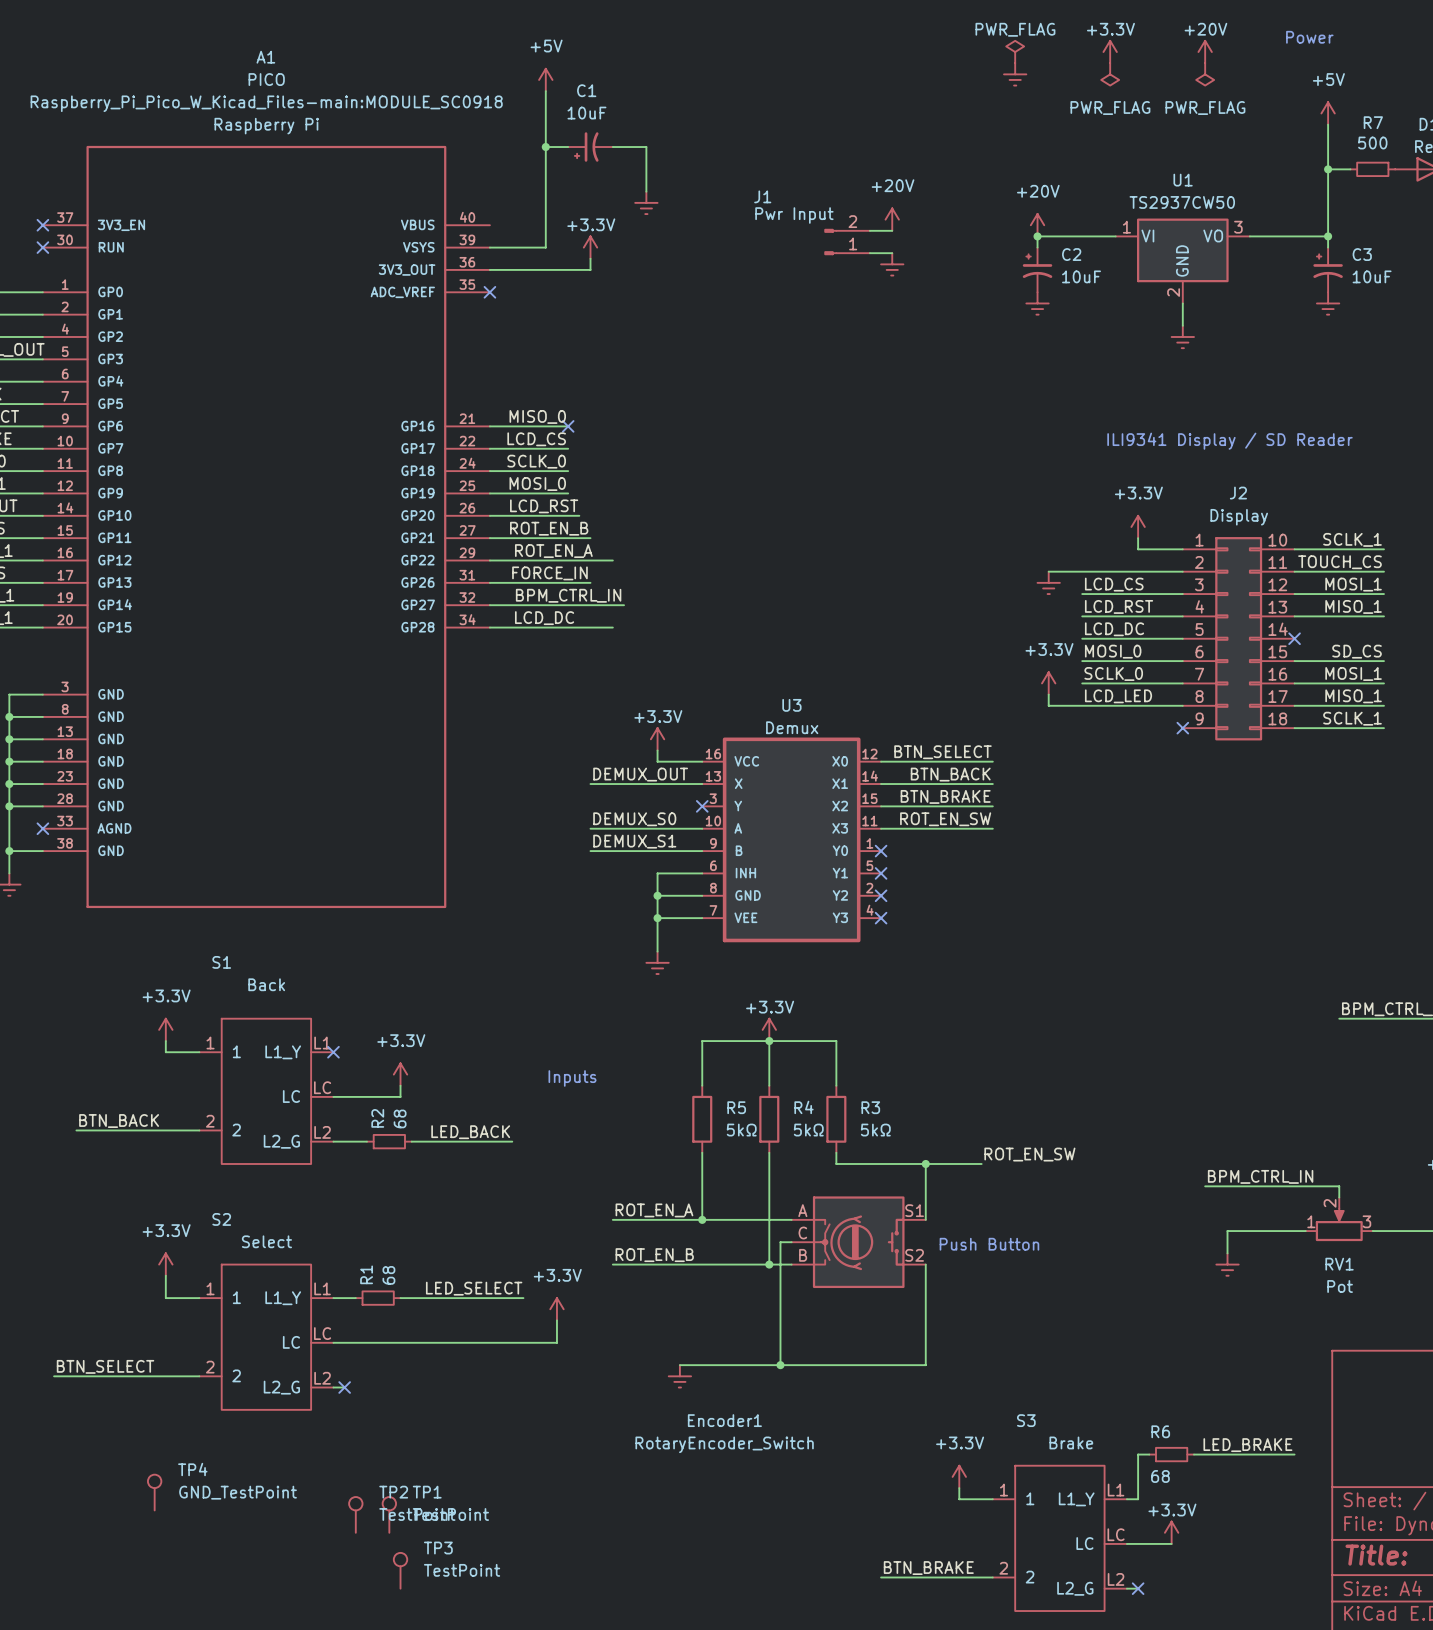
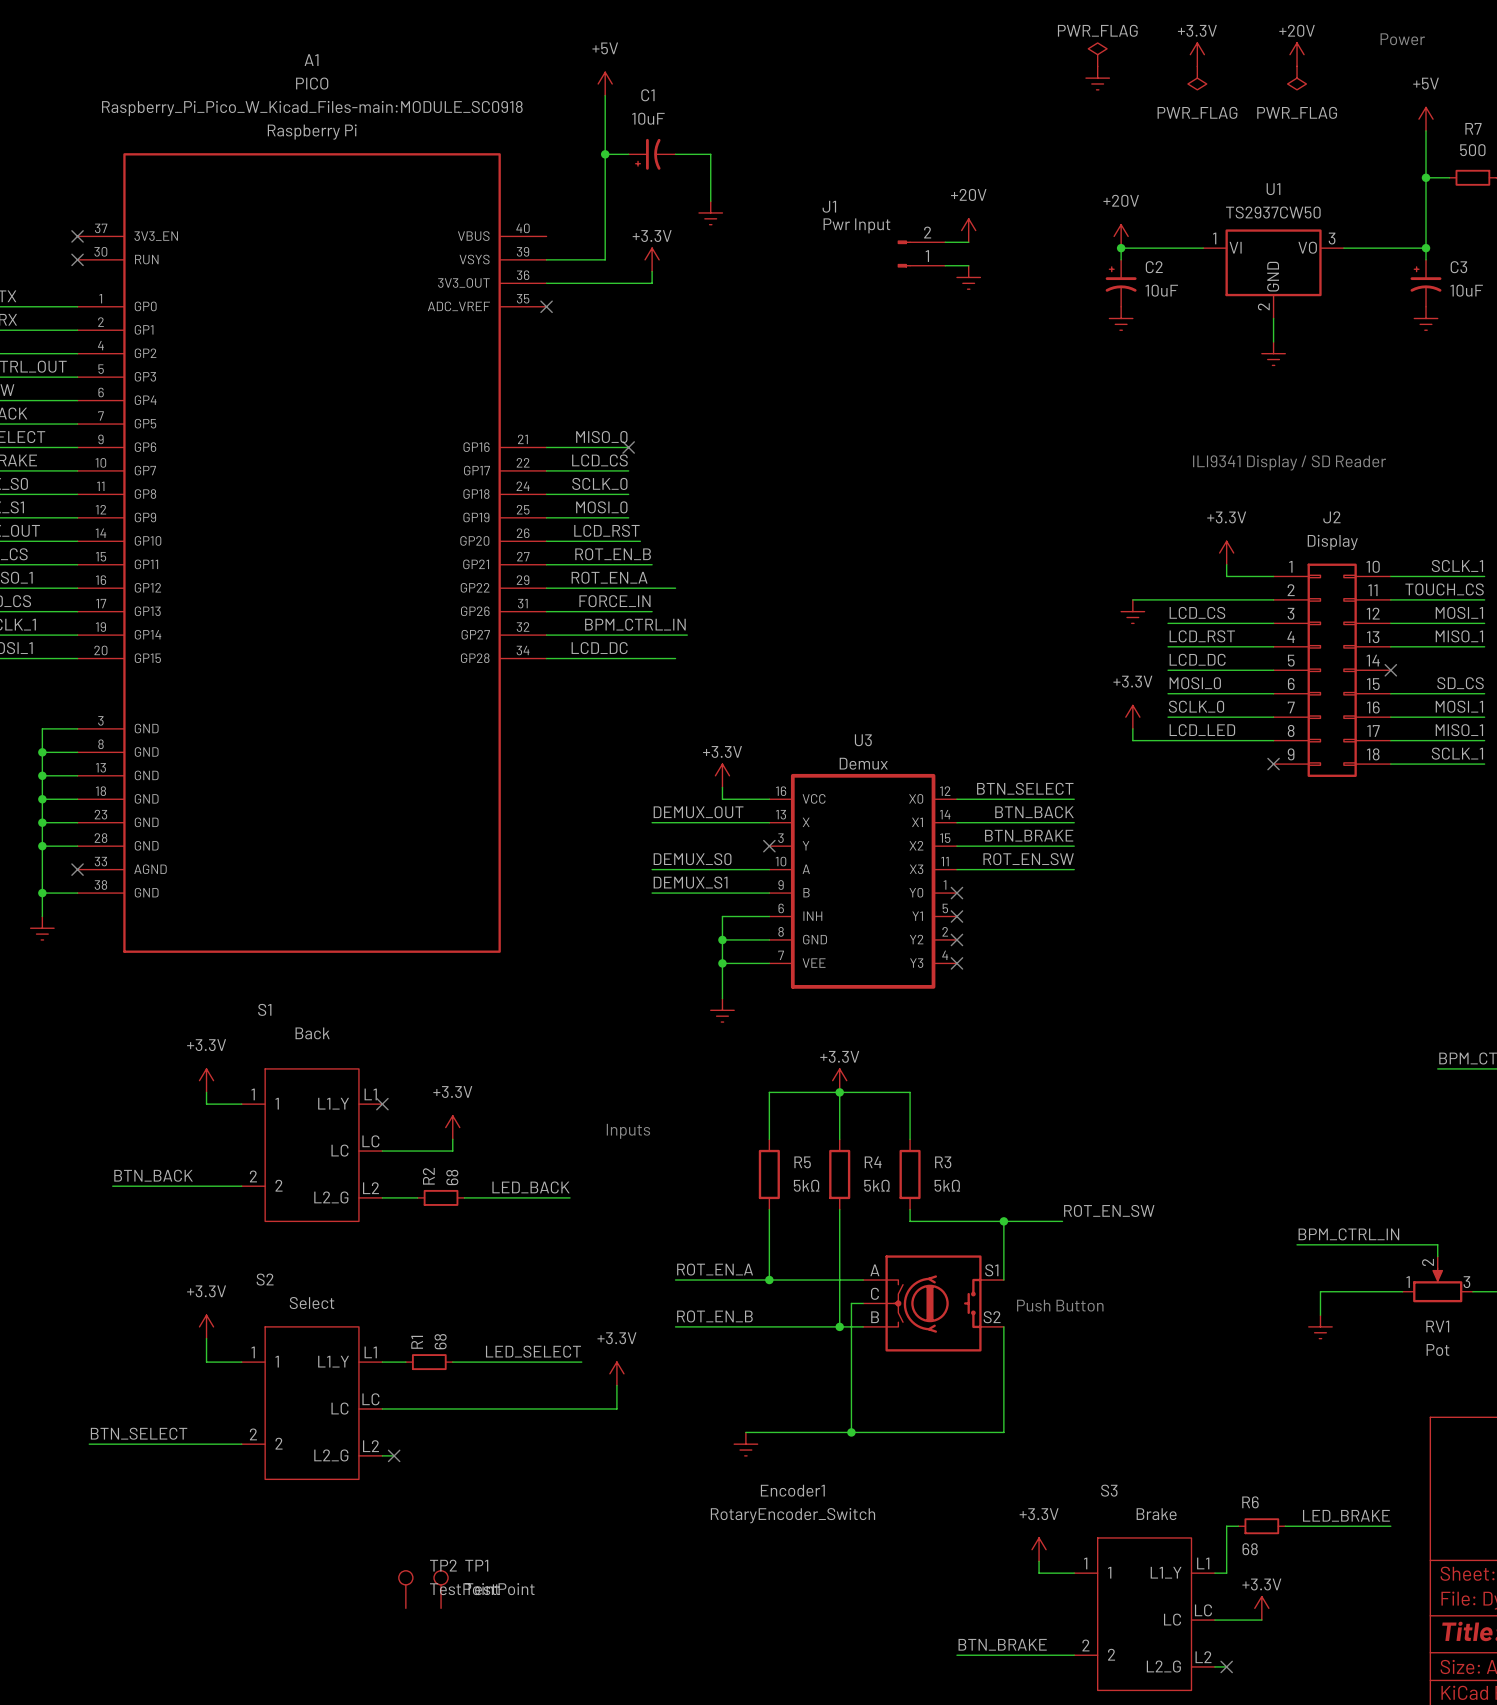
TP4: GND_TestPoint (154, 1492) -> none
TP3: TestPoint (400, 1570) -> none

